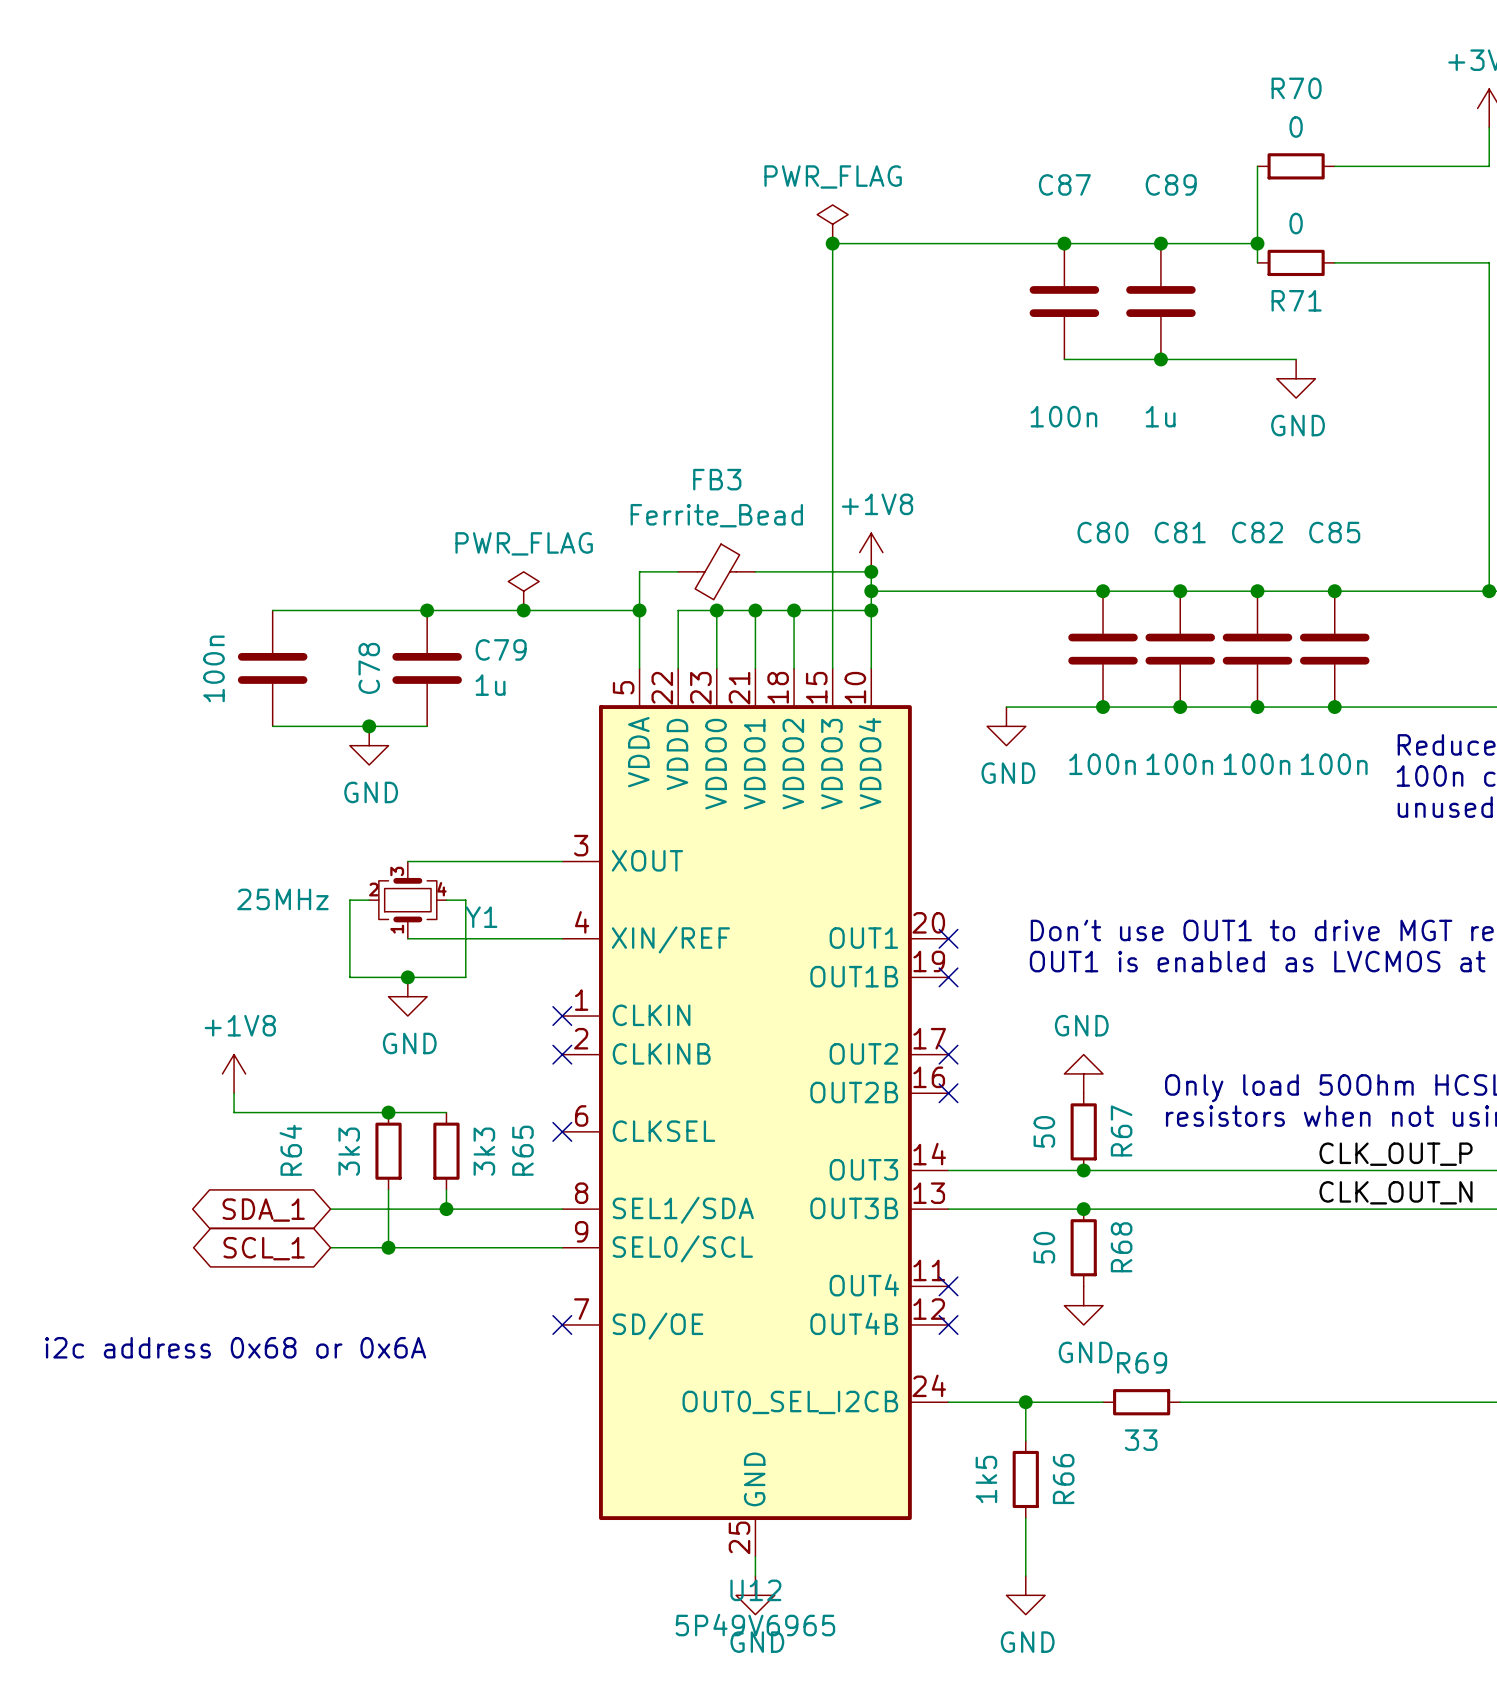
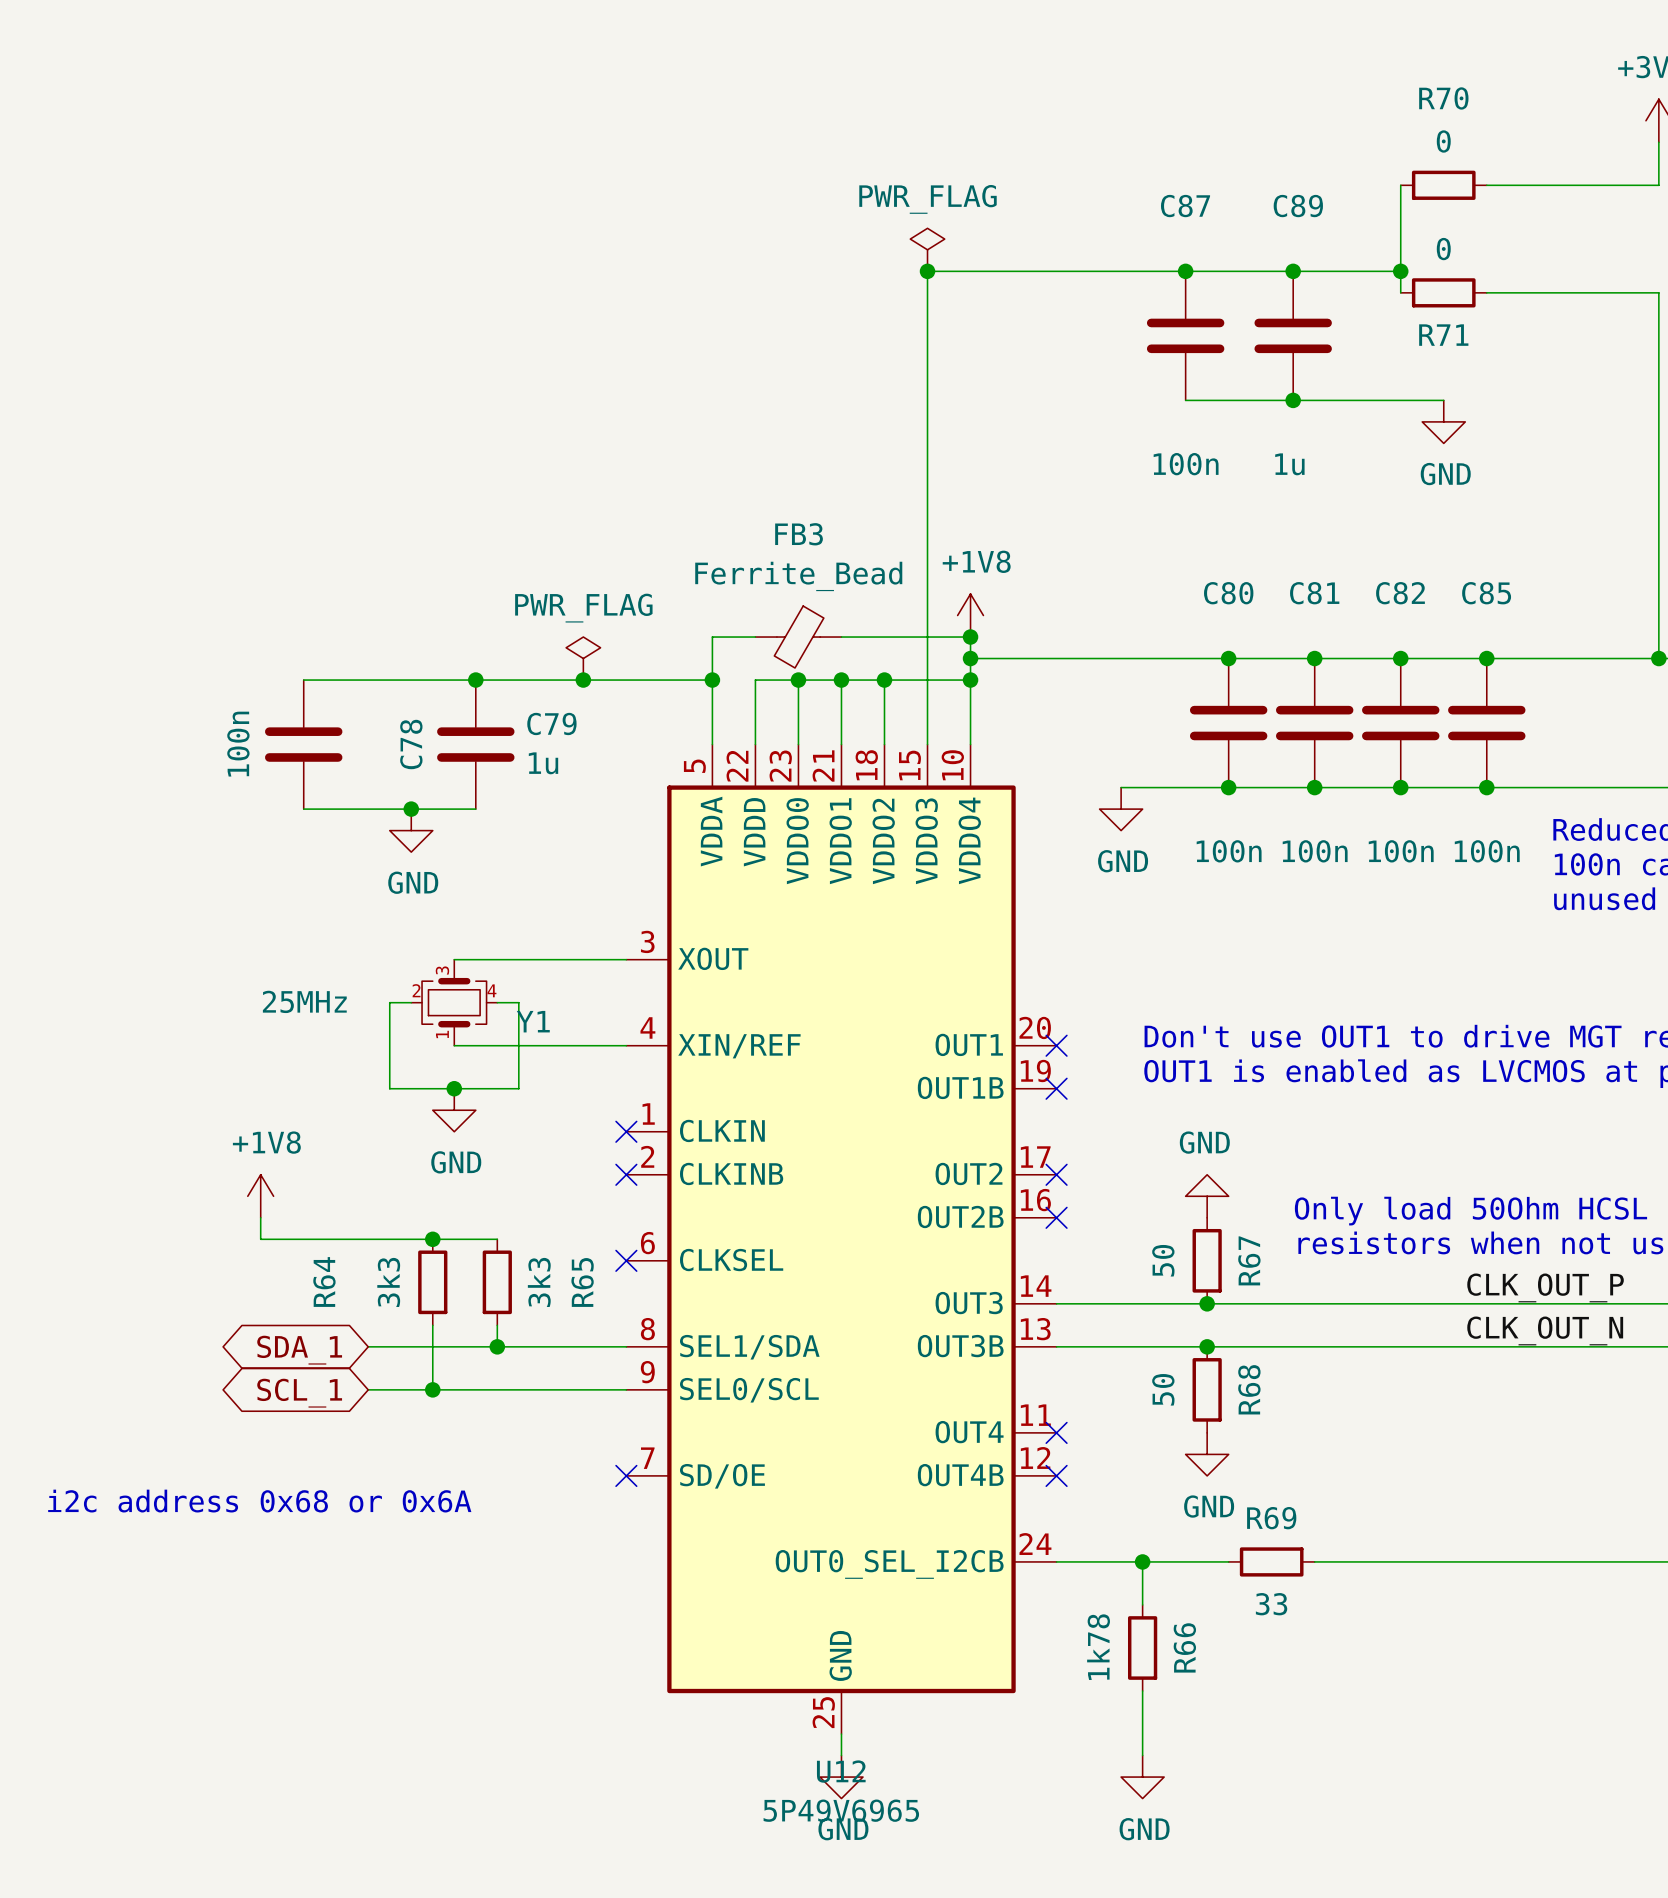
R66 value: 1k5 (986, 1479) -> 1k78 (1098, 1647)

